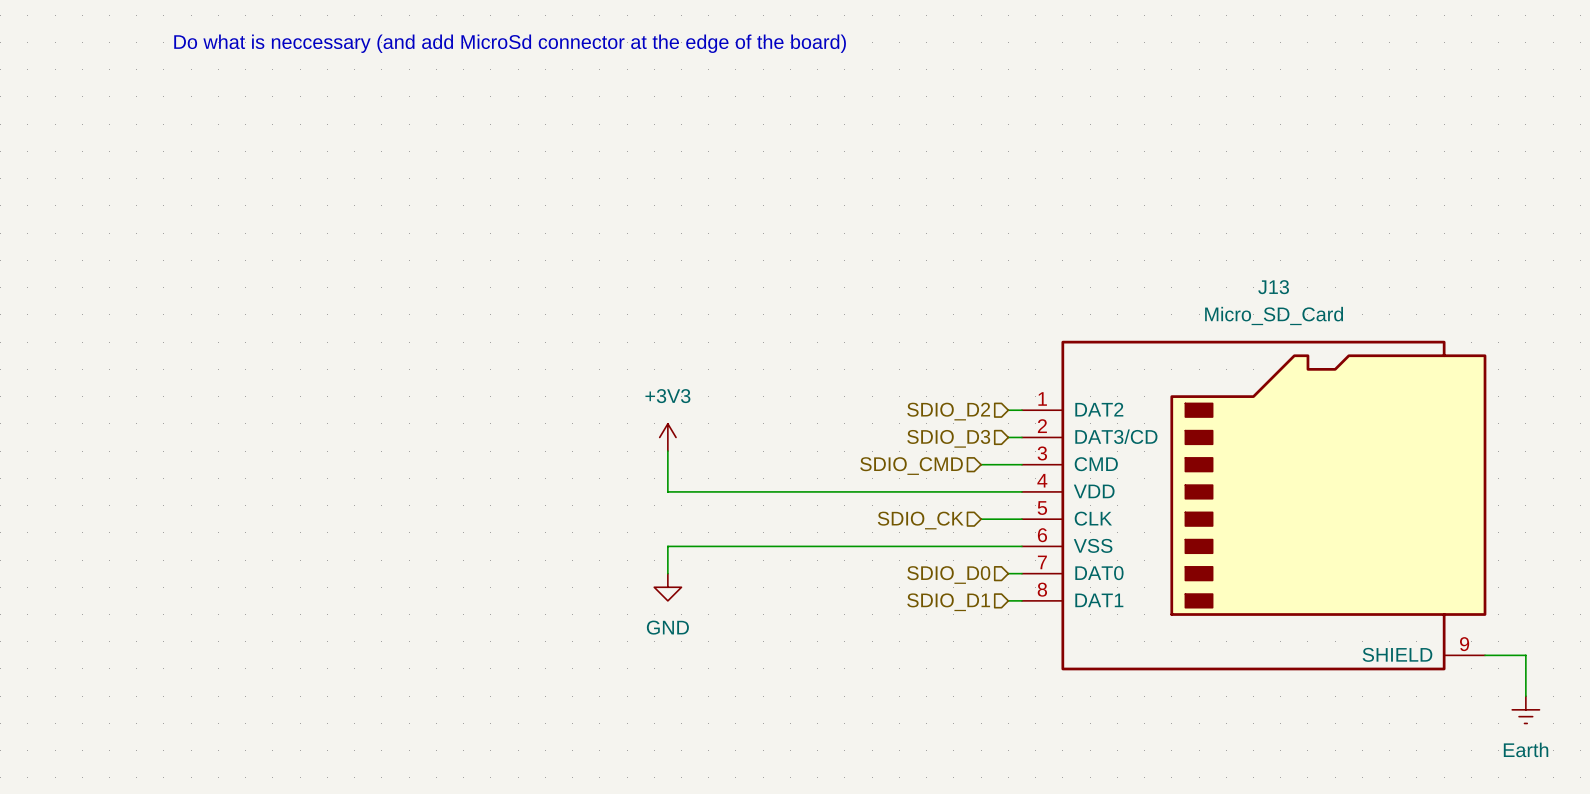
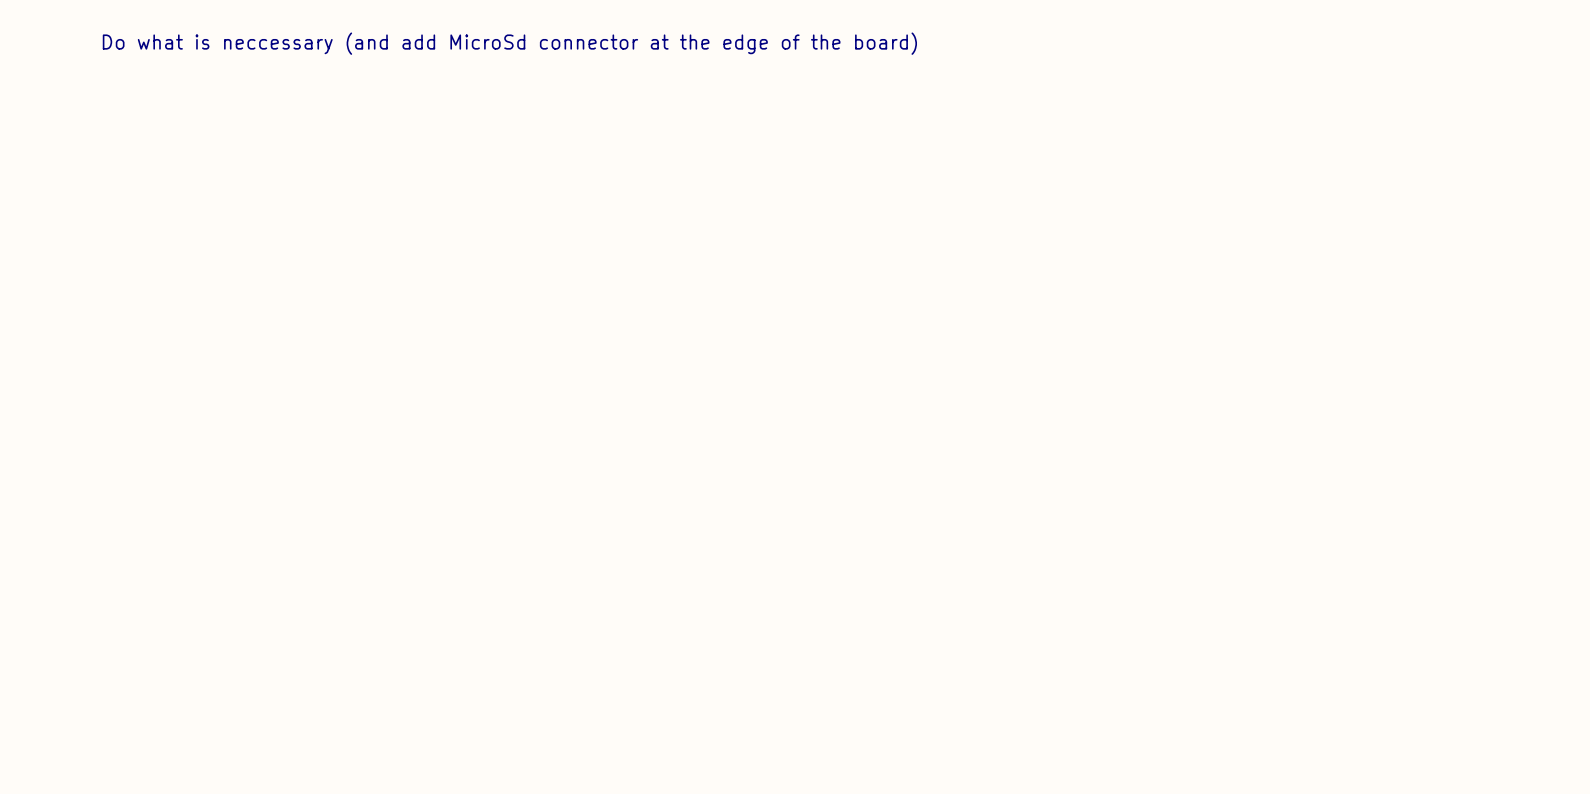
wire: (1008, 410) (1021, 410) -> none
hierarchical label: SDIO_D2 (948, 411) -> none
power symbol: +3V3 (667, 437) -> none
wire: (1008, 437) (1021, 437) -> none
hierarchical label: SDIO_D3 (948, 438) -> none
wire: (667, 451) (667, 491) (1021, 491) -> none
wire: (981, 464) (1021, 464) -> none
hierarchical label: SDIO_CMD (911, 466) -> none
J13: Micro_SD_Card (1254, 505) -> none
wire: (981, 519) (1021, 519) -> none
hierarchical label: SDIO_CK (920, 520) -> none
wire: (1021, 546) (667, 546) (667, 573) -> none
wire: (1008, 573) (1021, 573) -> none
hierarchical label: SDIO_D0 (948, 575) -> none
power symbol: GND (667, 587) -> none
wire: (1008, 600) (1021, 600) -> none
hierarchical label: SDIO_D1 (948, 602) -> none
wire: (1485, 655) (1525, 655) (1525, 696) -> none
power symbol: Earth (1525, 709) -> none

